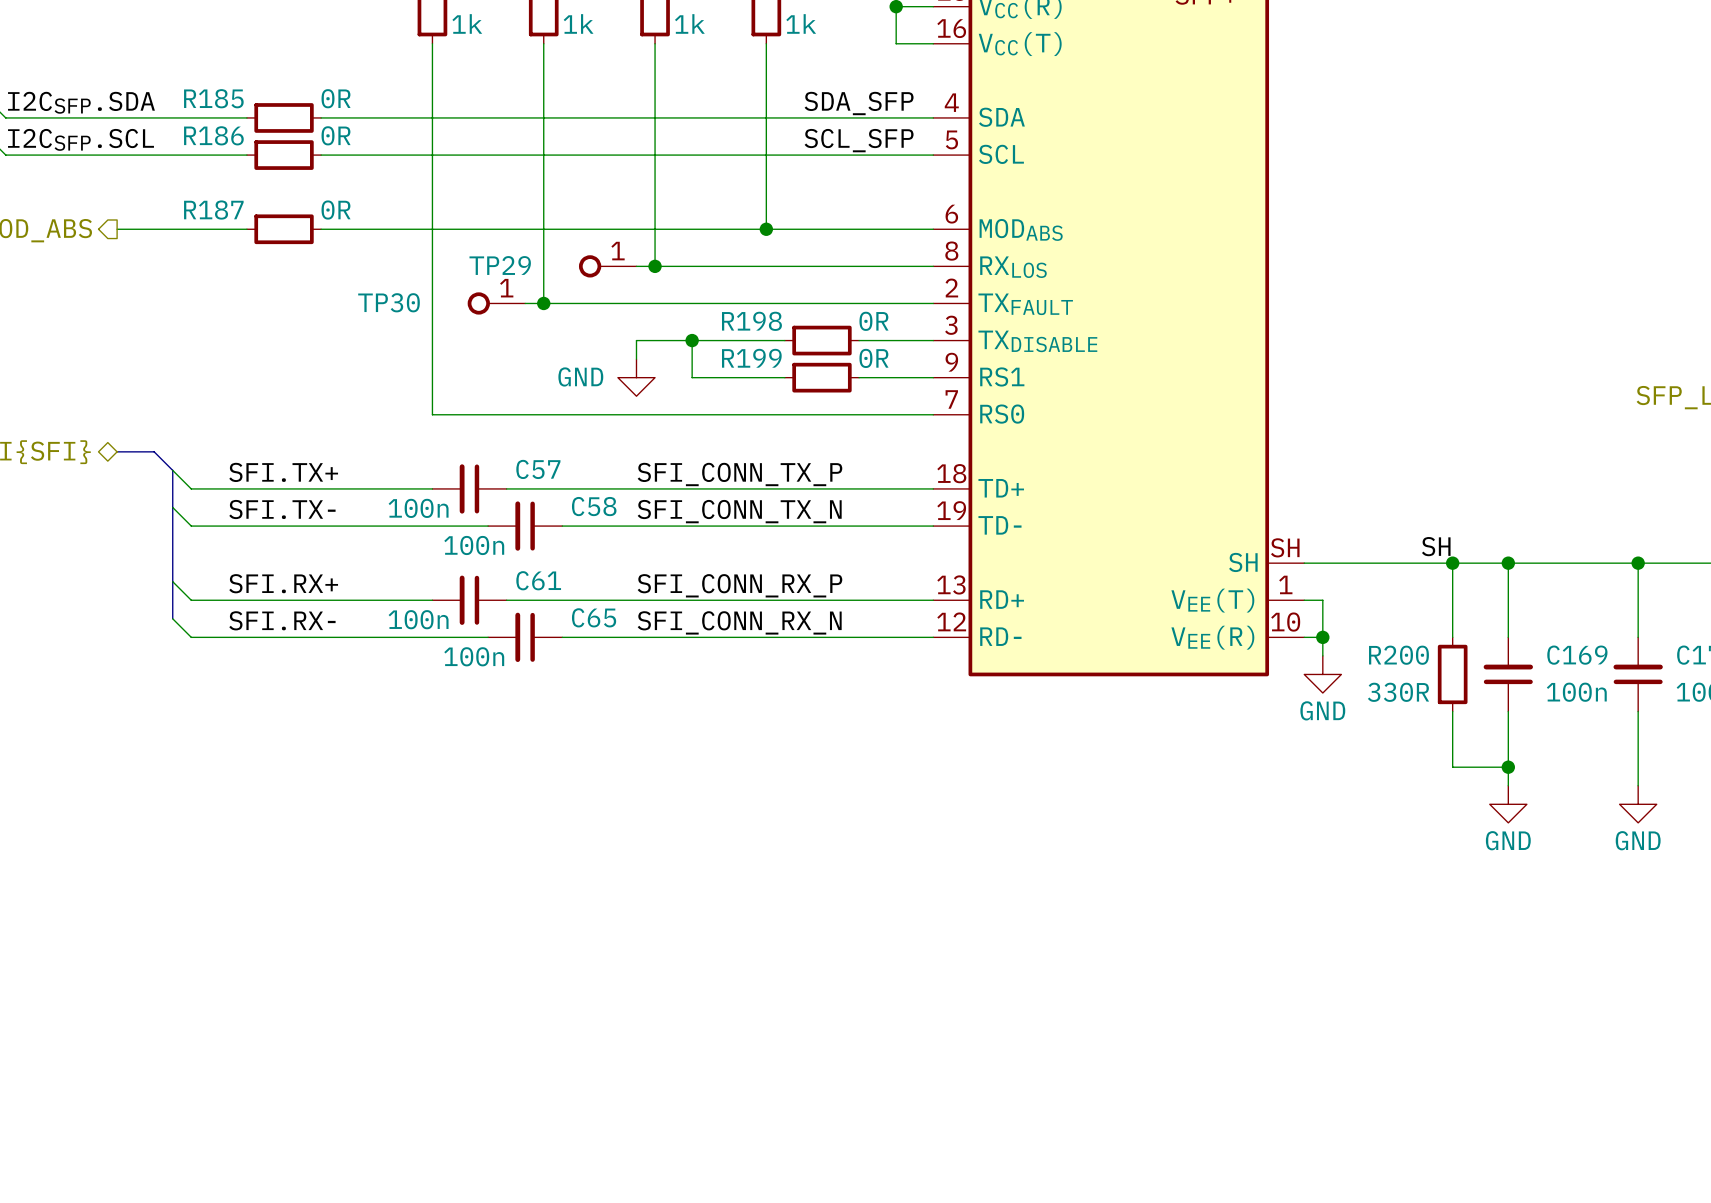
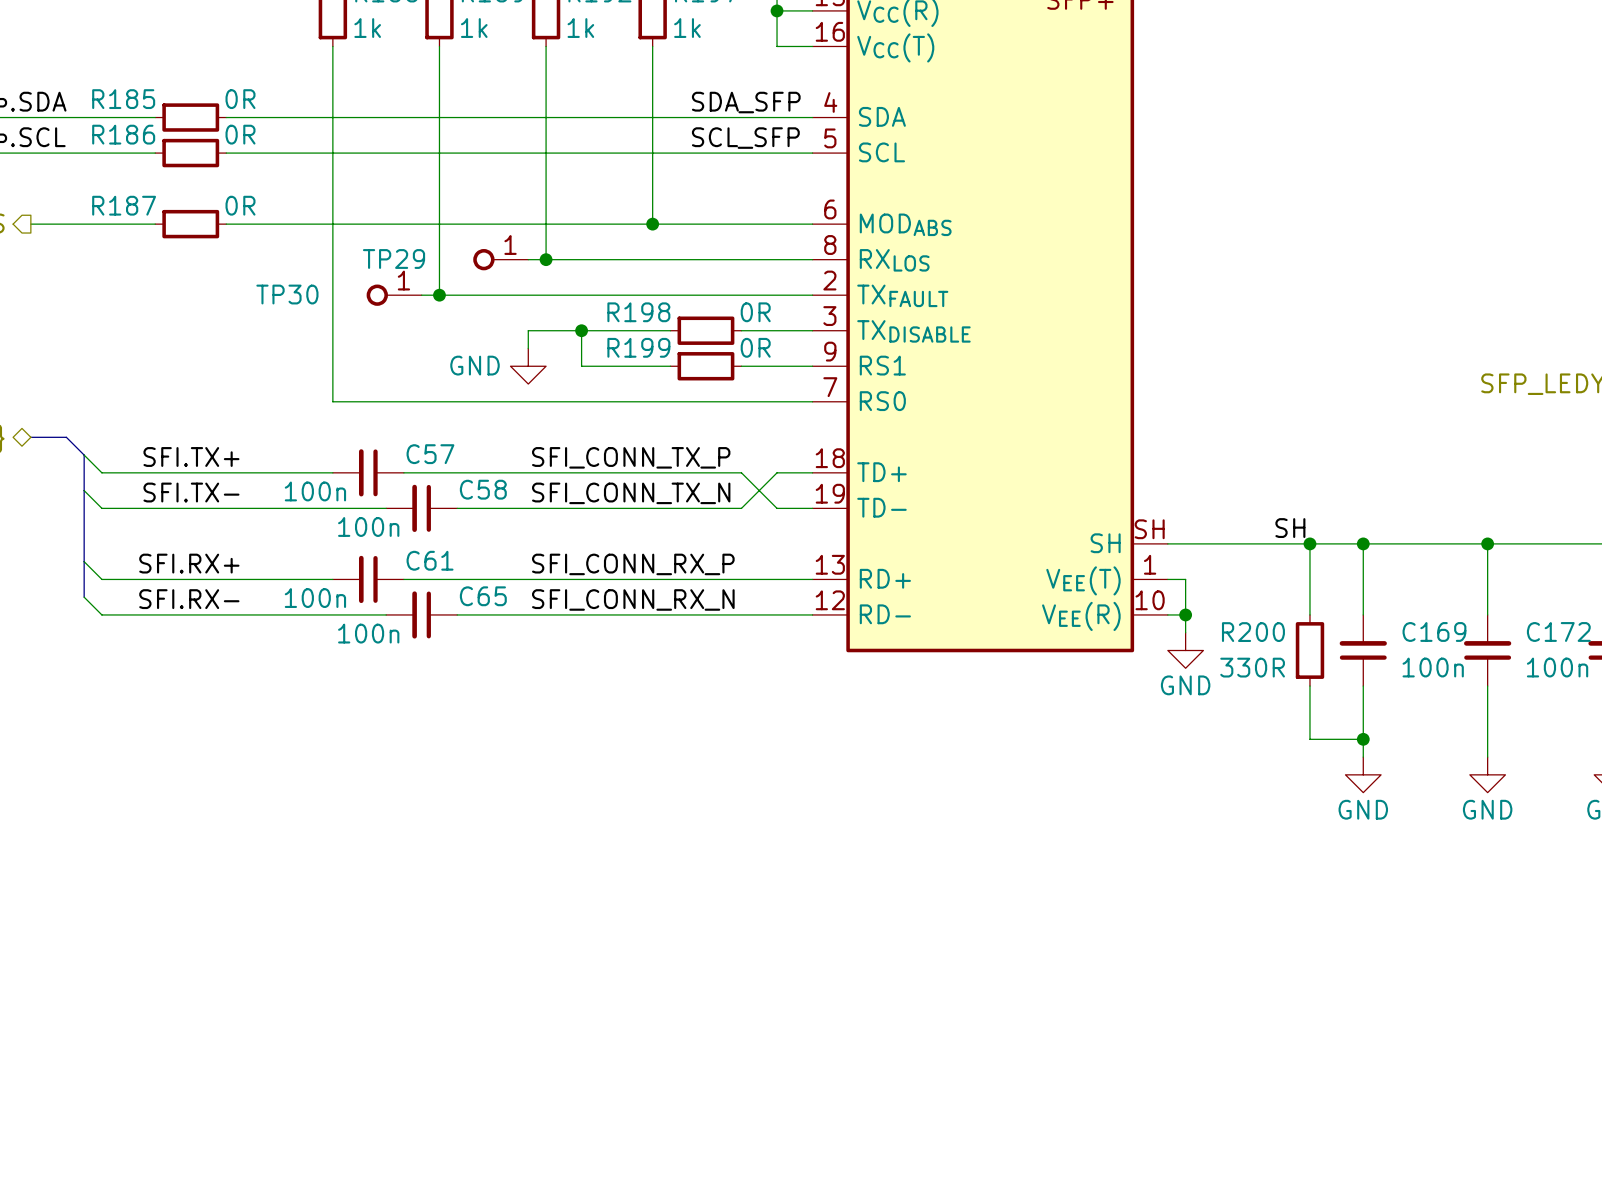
wire: (859, 488) (896, 488) -> (741, 472) (777, 508)
wire: (859, 526) (896, 526) -> (741, 508) (777, 472)

